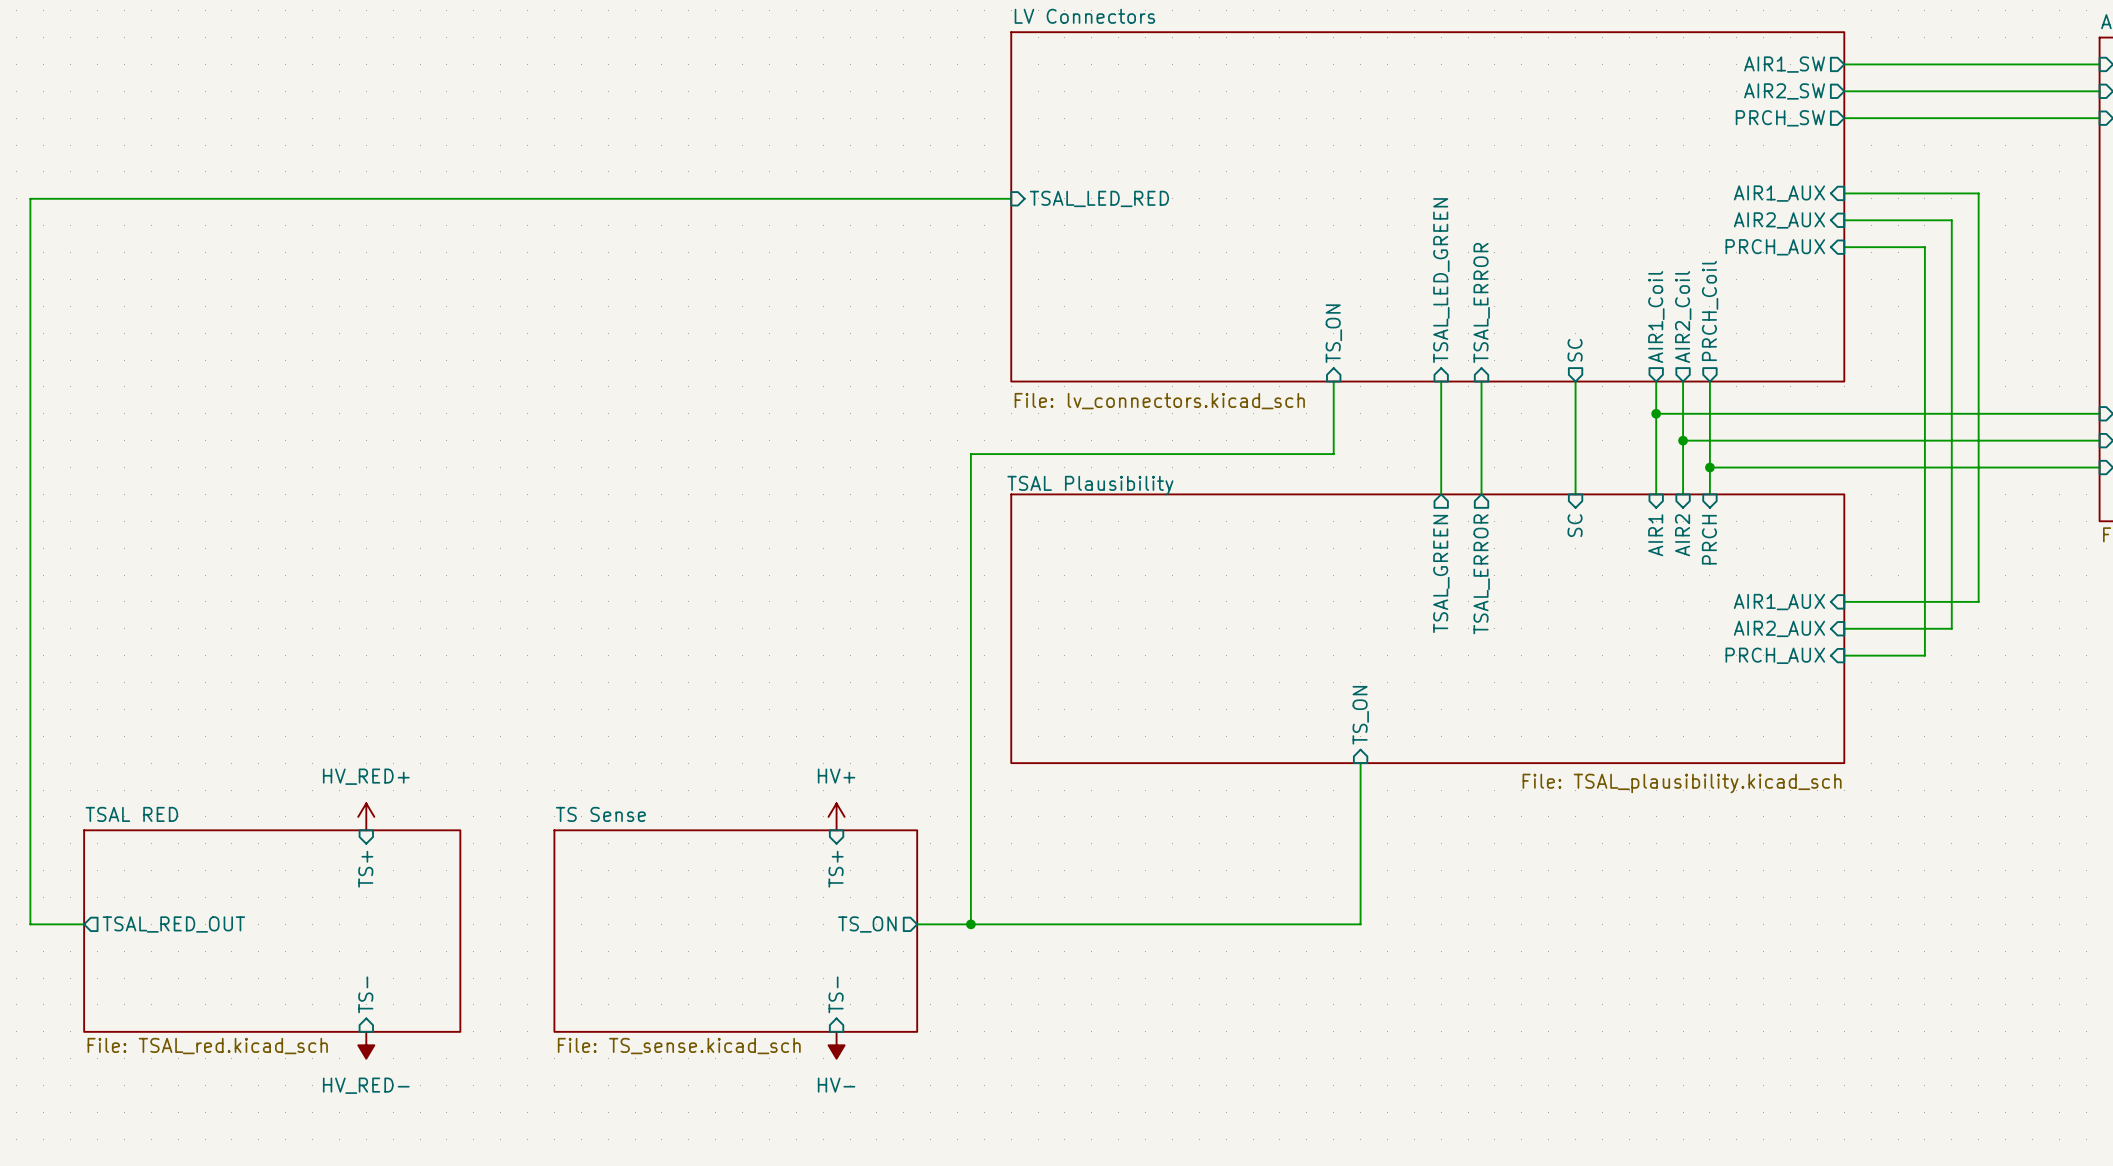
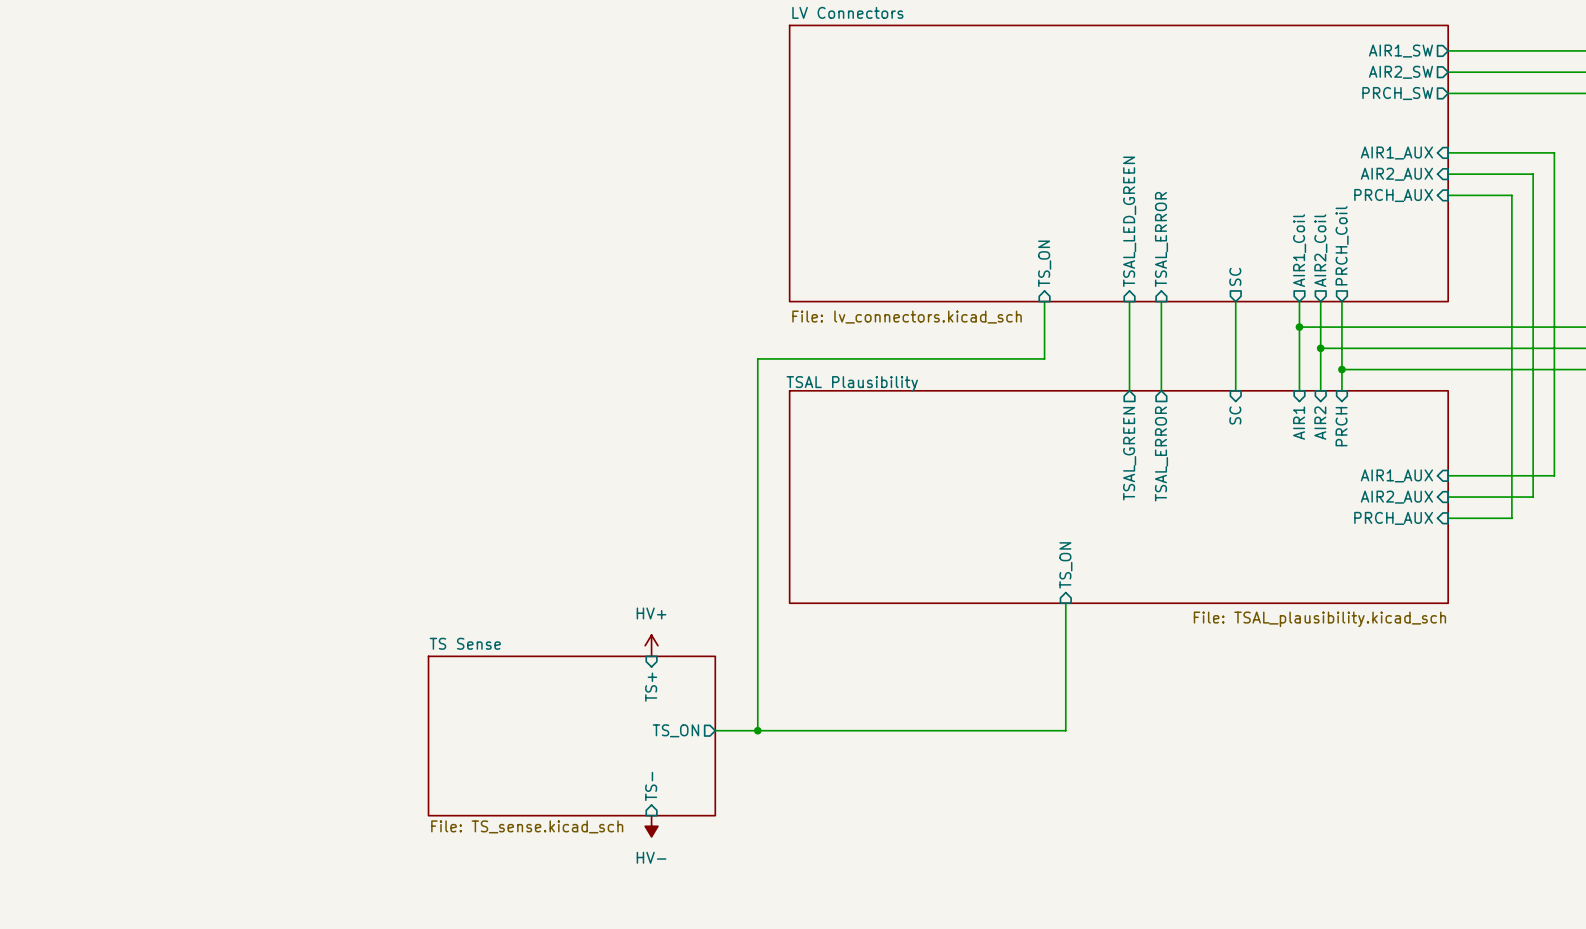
wire: (1011, 198) (30, 198) (30, 924) (84, 924) -> none
sheet pin: TSAL_LED_RED (1099, 198) -> none
power symbol: HV_RED+ (366, 816) -> none
sheet pin: TS+ (365, 869) -> none
sheet pin: TSAL_RED_OUT (173, 924) -> none
sheet TSAL RED: File: TSAL_red.kicad_sch (272, 931) -> none
sheet pin: TS- (365, 994) -> none
power symbol: HV_RED- (366, 1045) -> none

